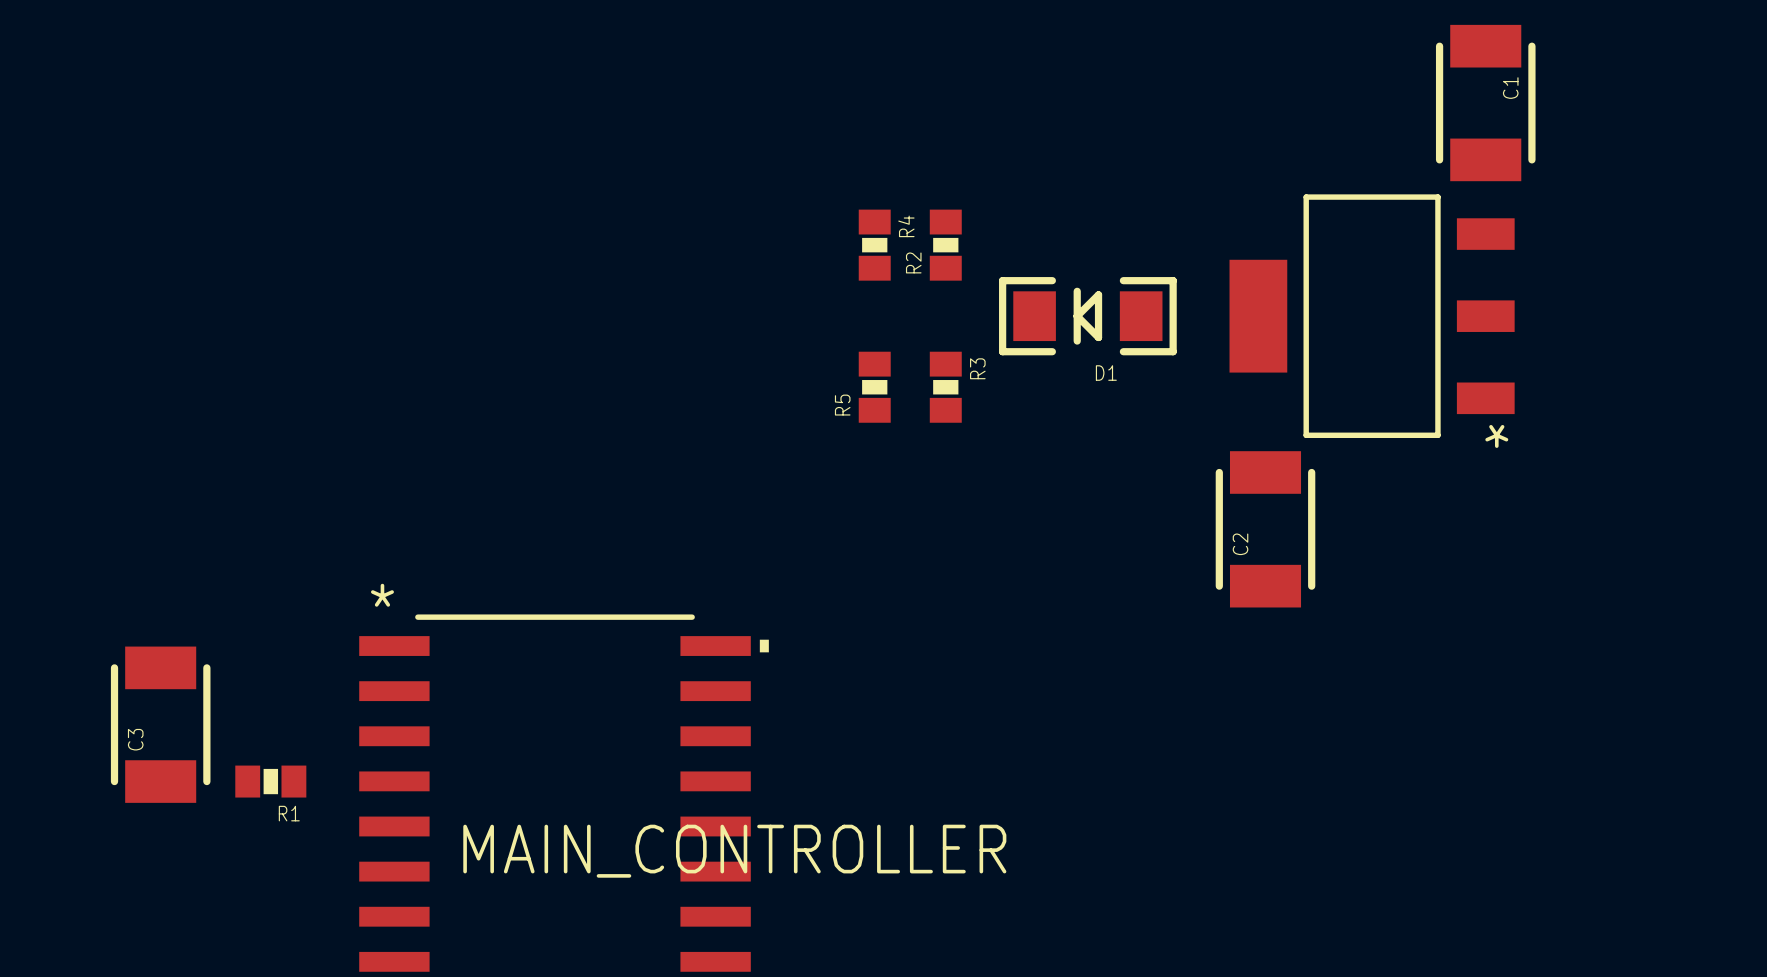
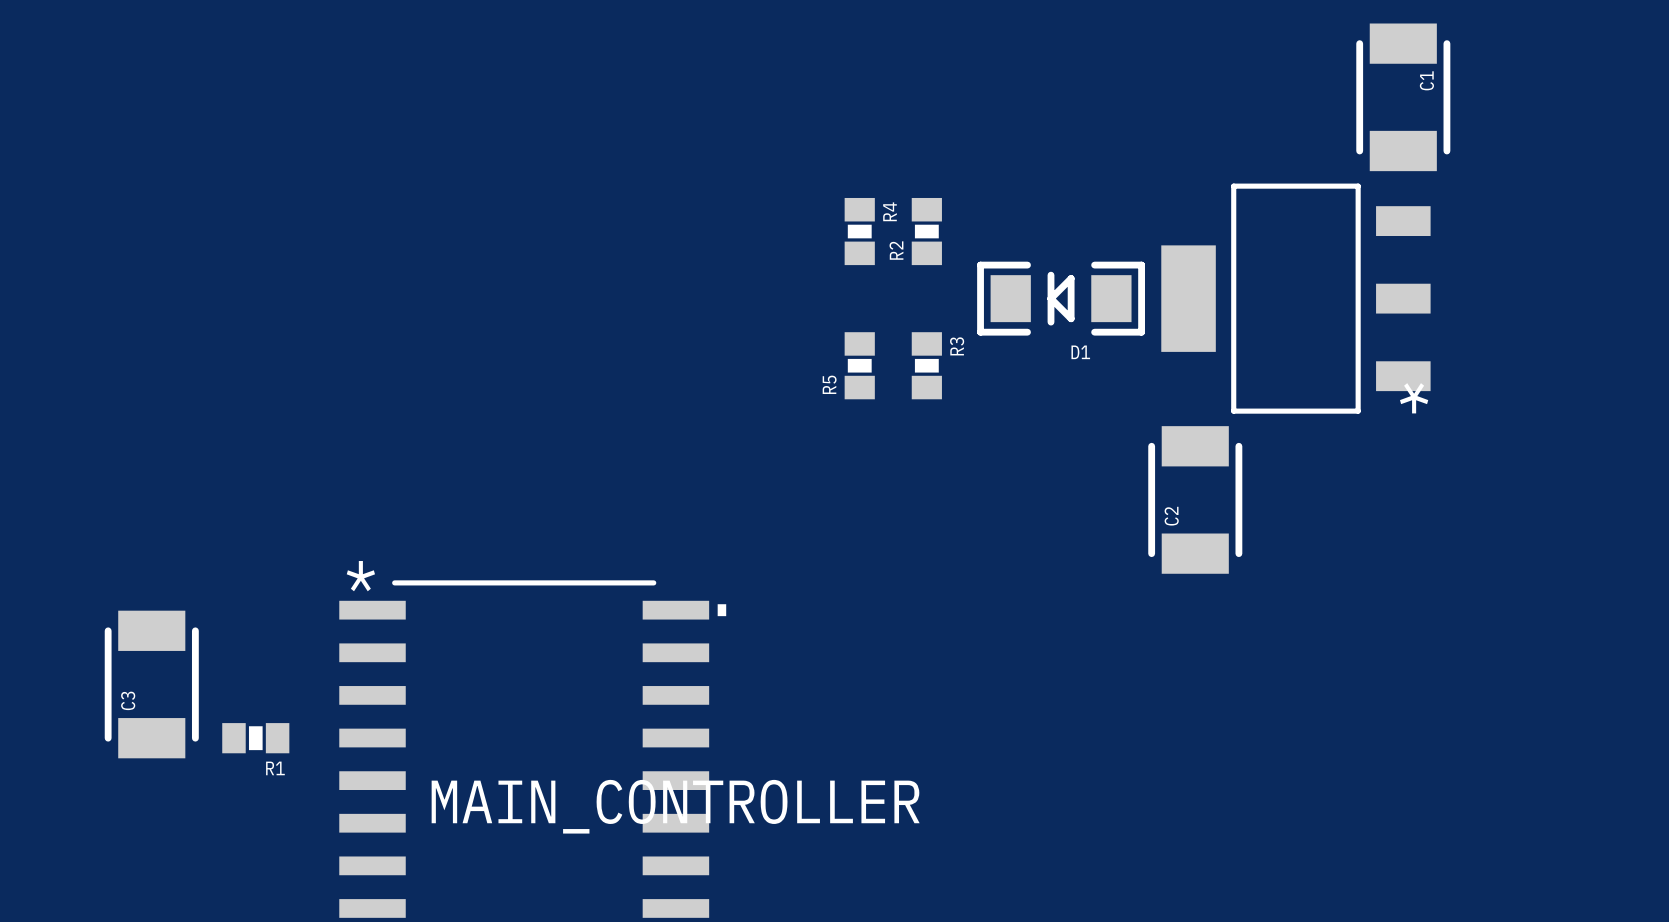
R4 position: (874, 245) -> (859, 231)
R2 position: (945, 245) -> (926, 231)
D1 position: (1087, 316) -> (1061, 298)
R5 position: (874, 387) -> (859, 365)
R3 position: (945, 387) -> (926, 365)

